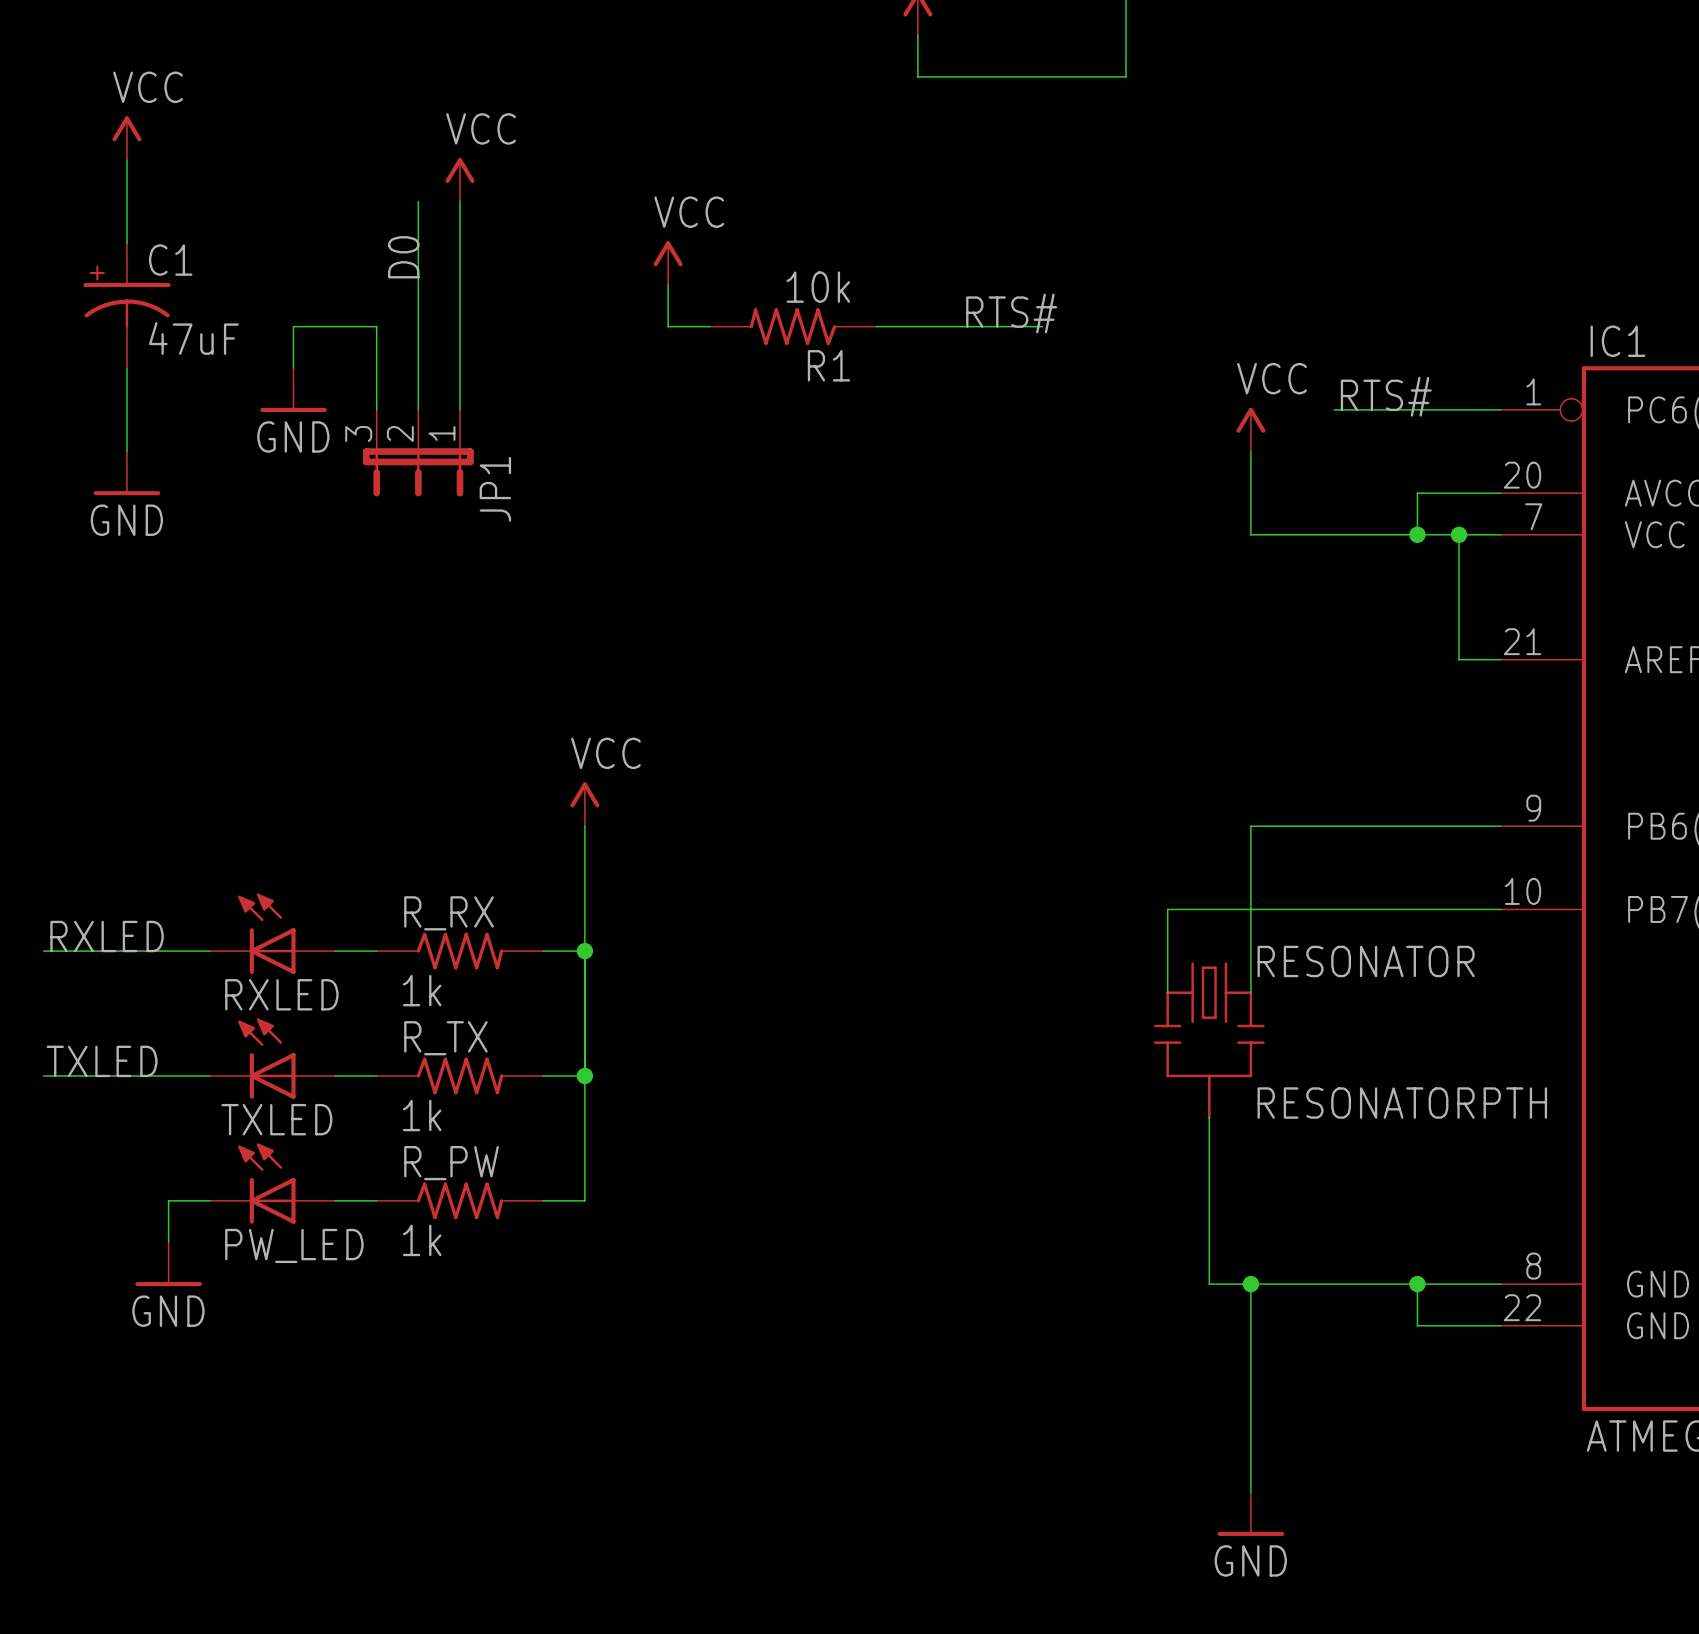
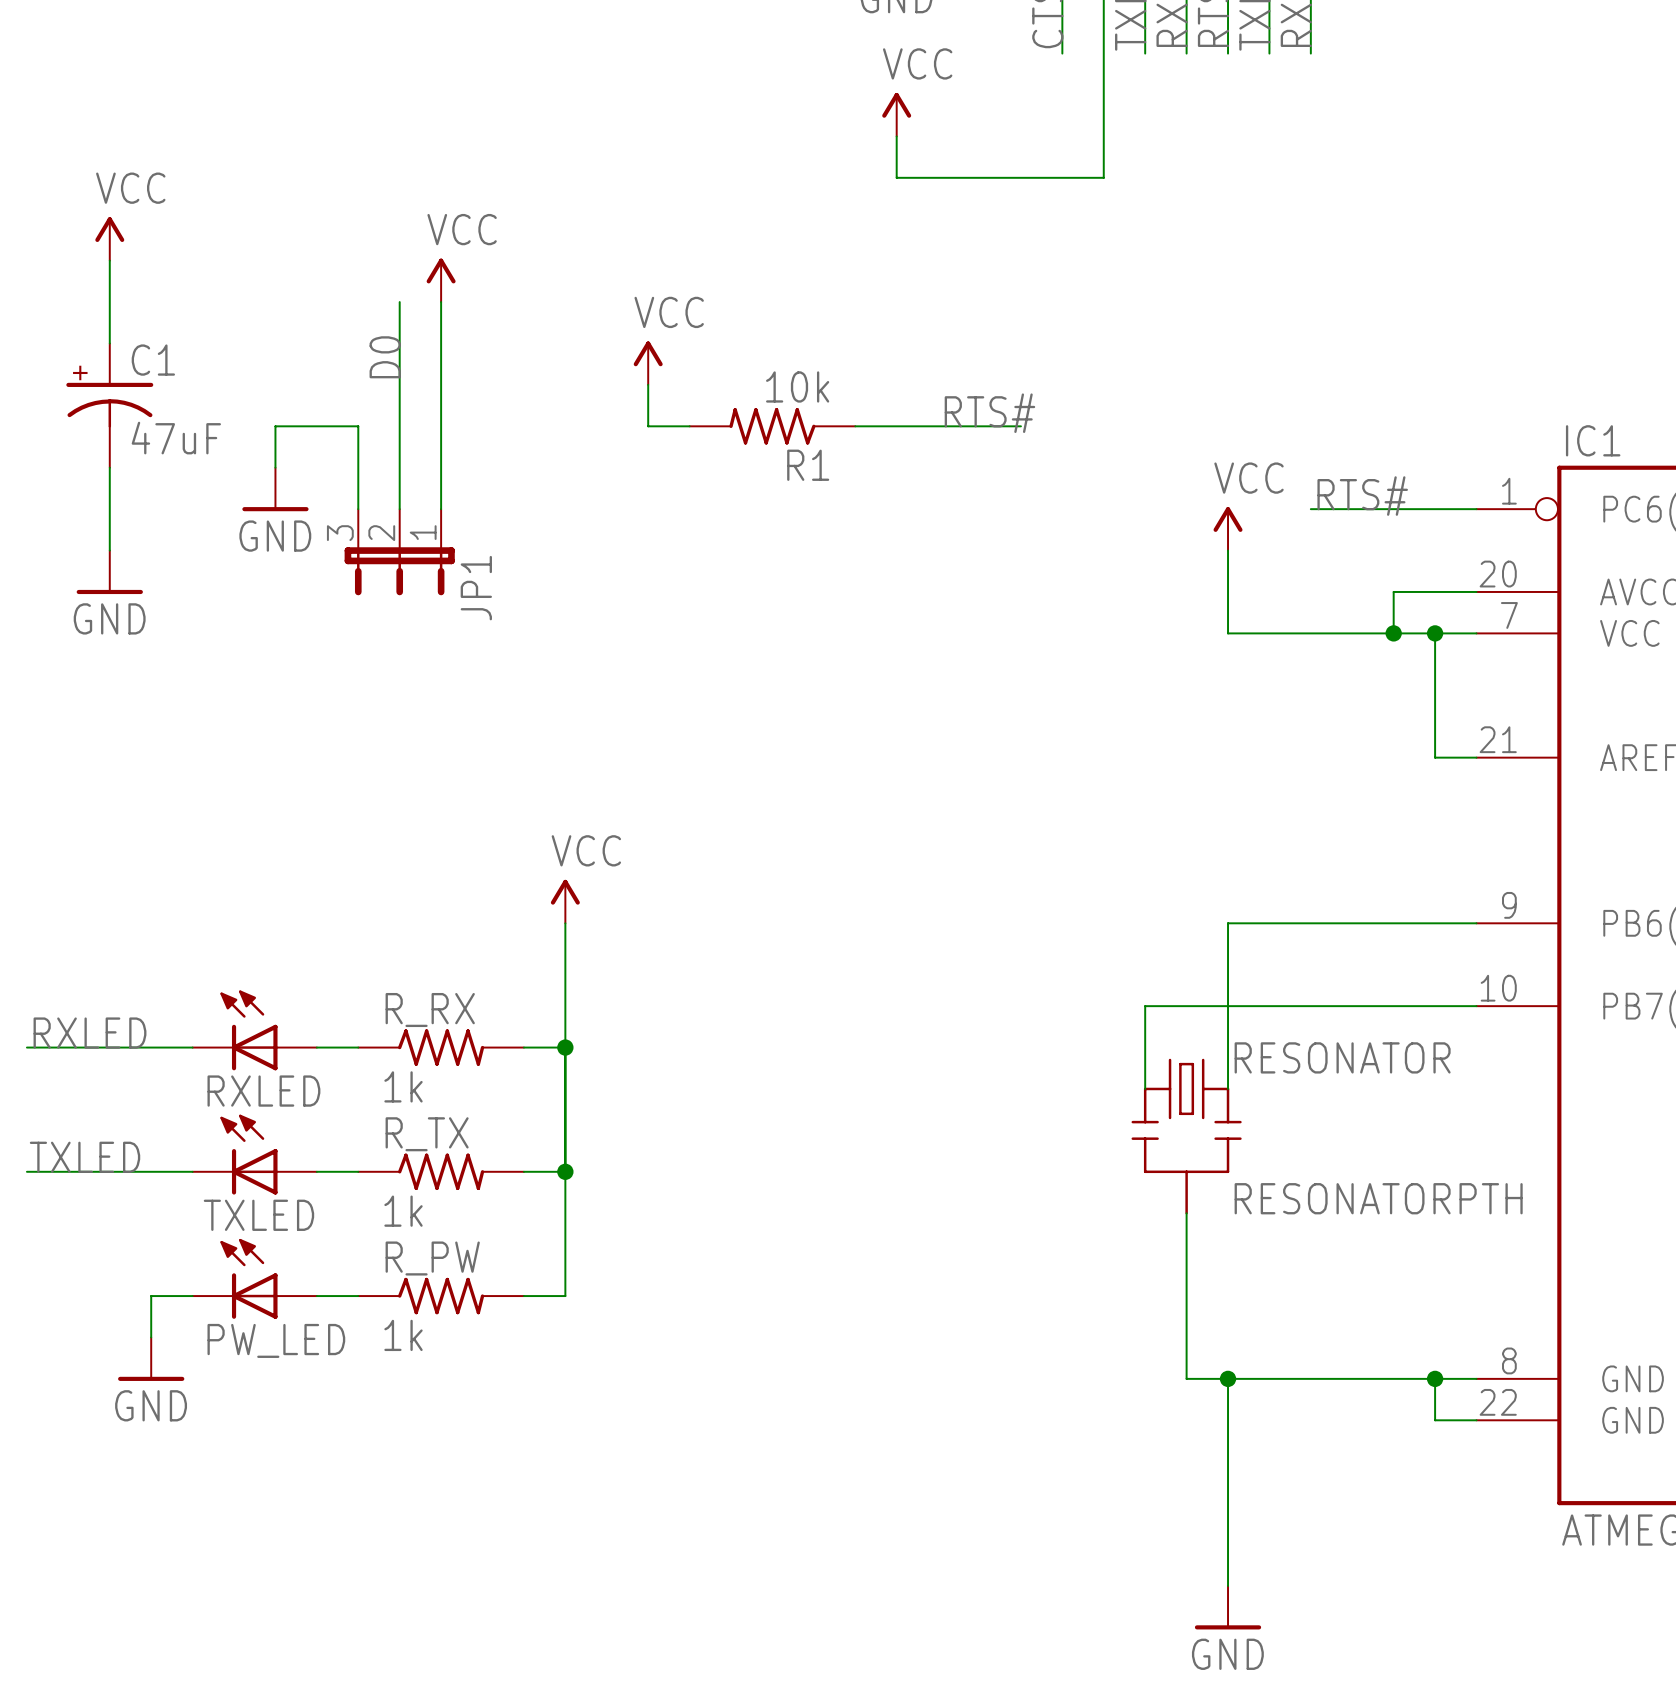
wire: (1417, 1284) (1417, 1325) (1459, 1325) -> (1435, 1378) (1435, 1420)
junction position: (1417, 1284) -> (1435, 1378)

